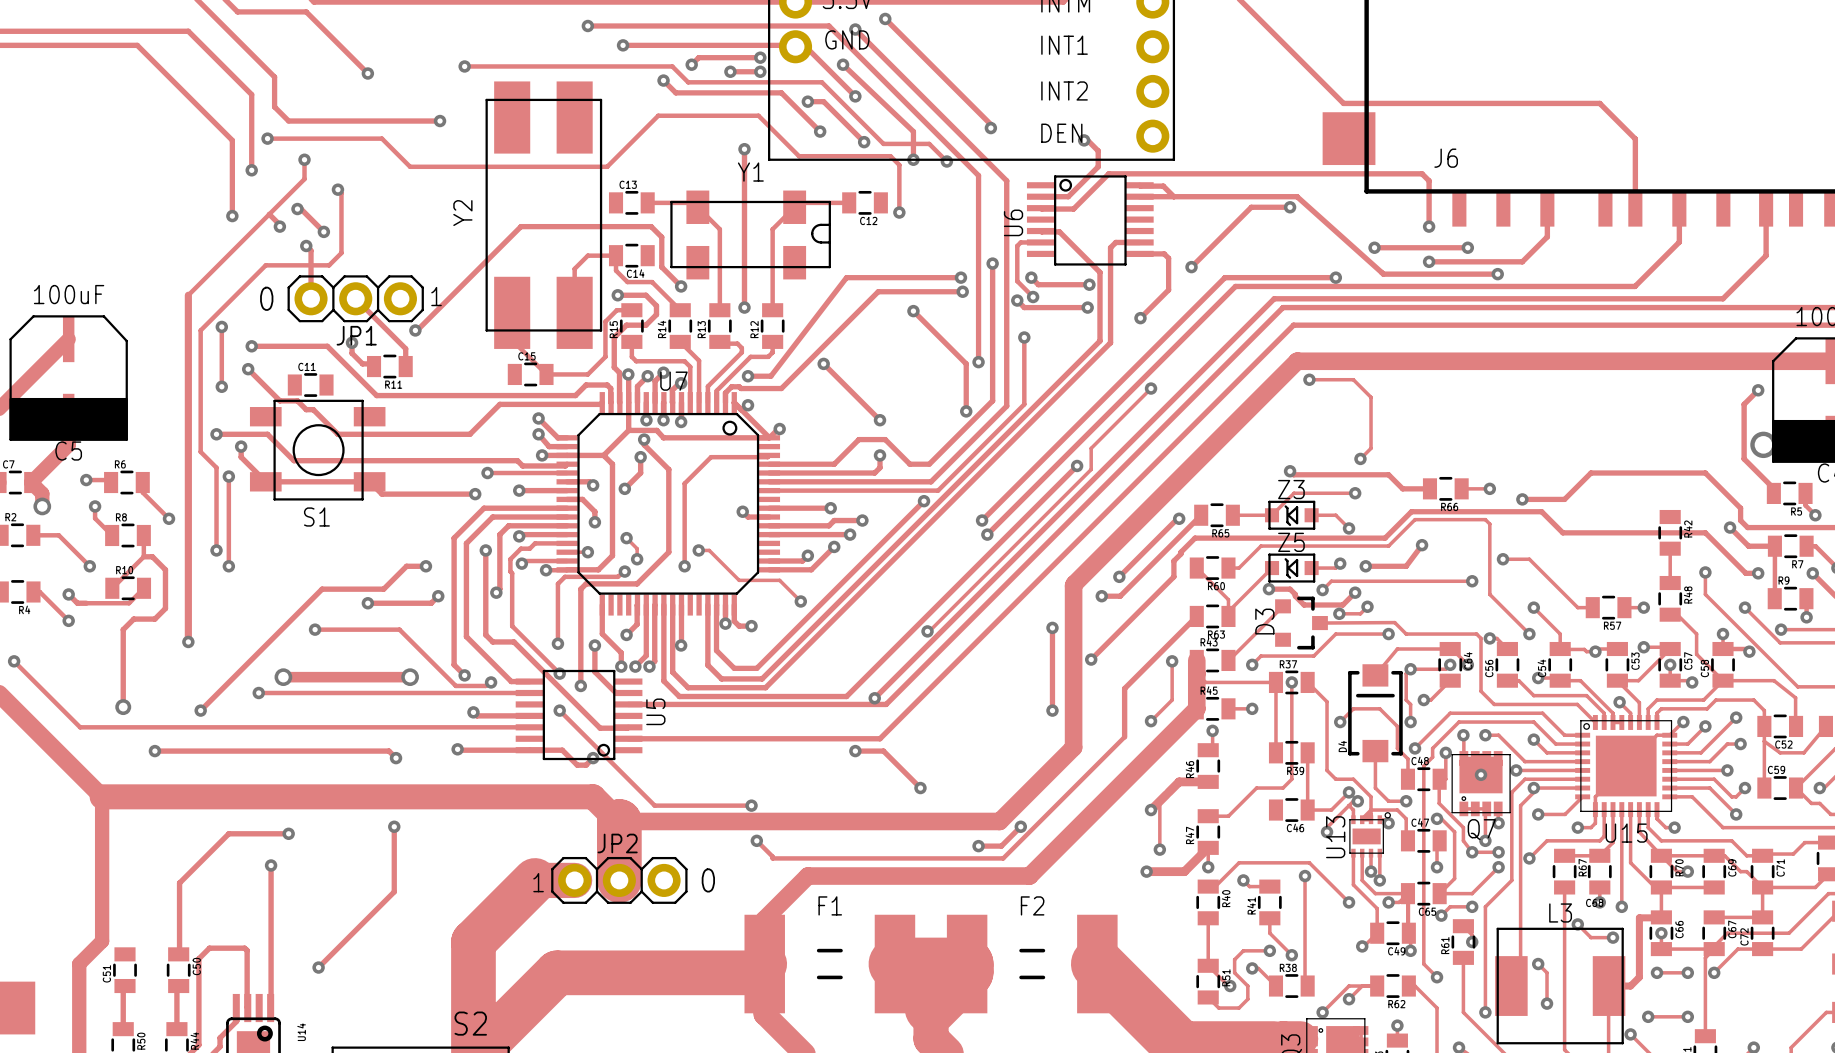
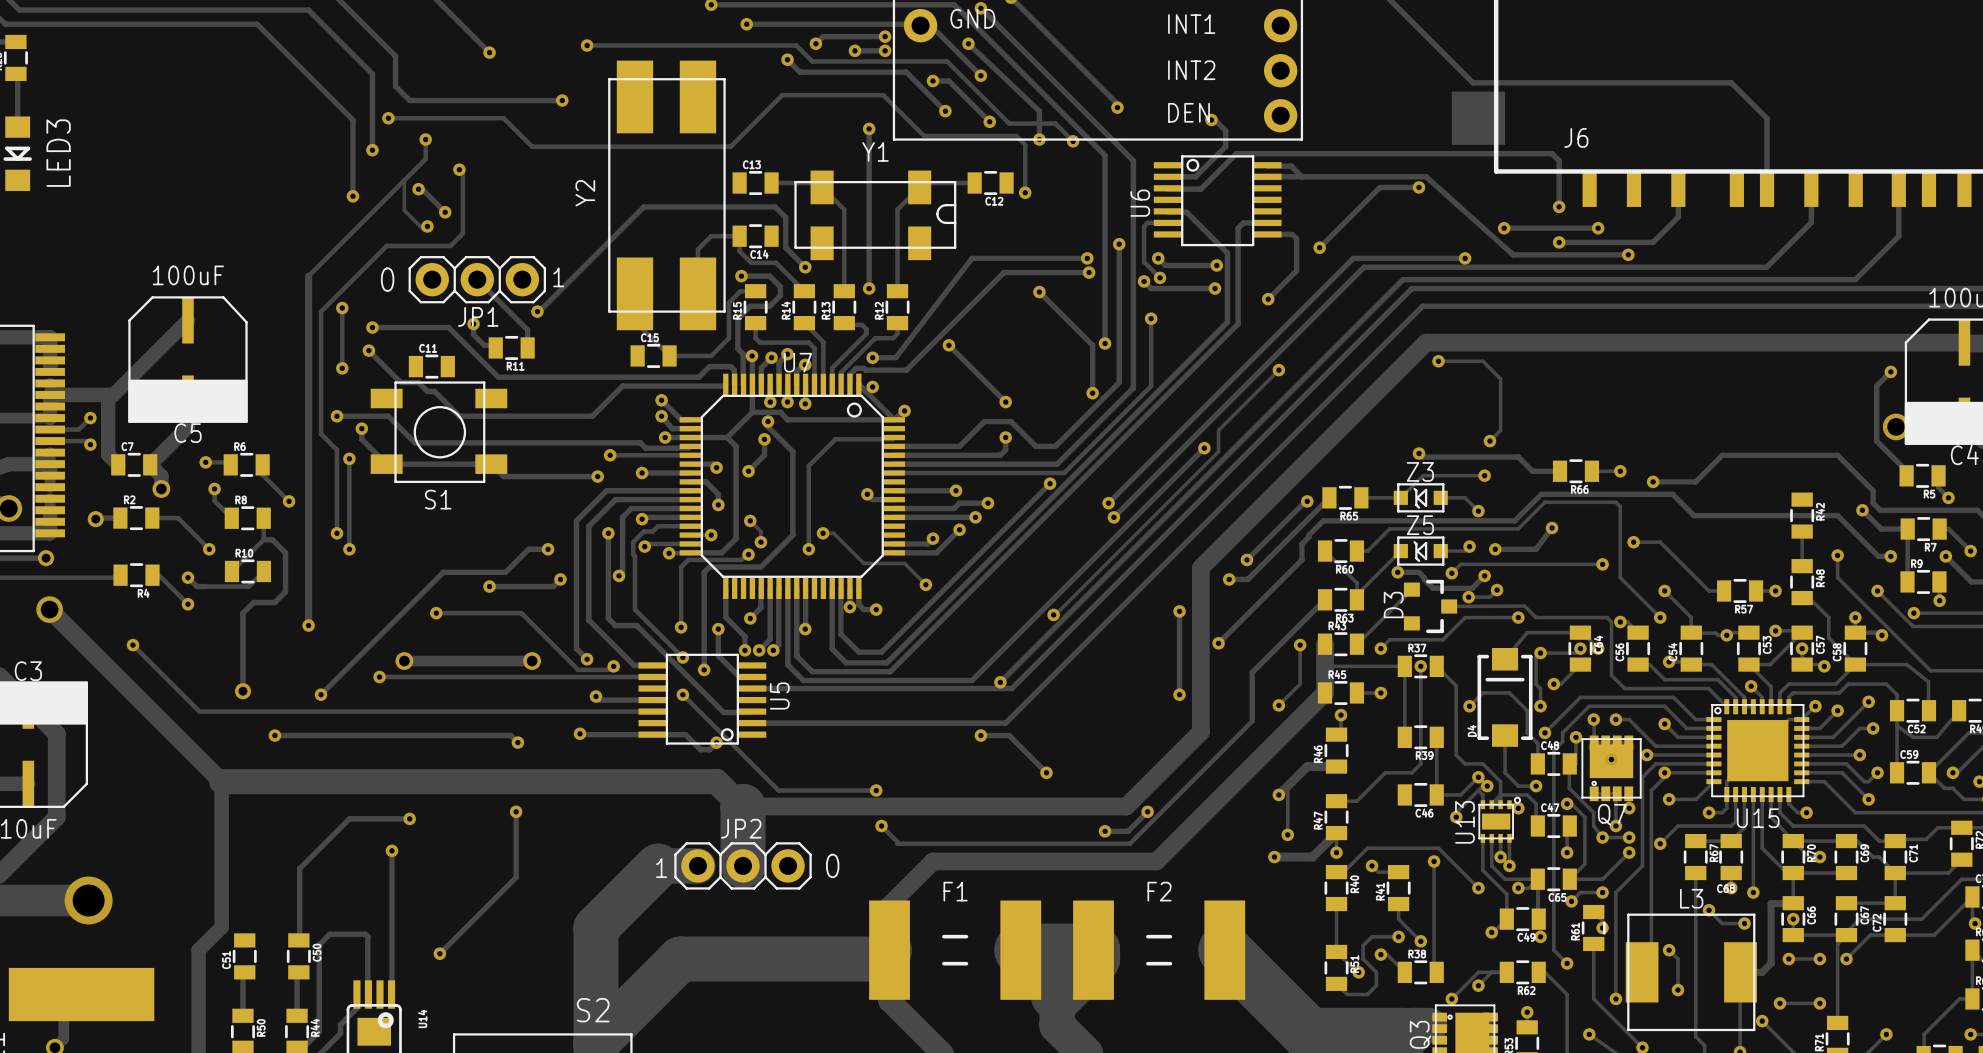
track: none -> (425, 159) (404, 180) (404, 210) (423, 230)
track: (269, 214) (279, 226) -> none
via: (279, 226) -> none
track: (306, 245) (311, 250) (311, 298) -> none

